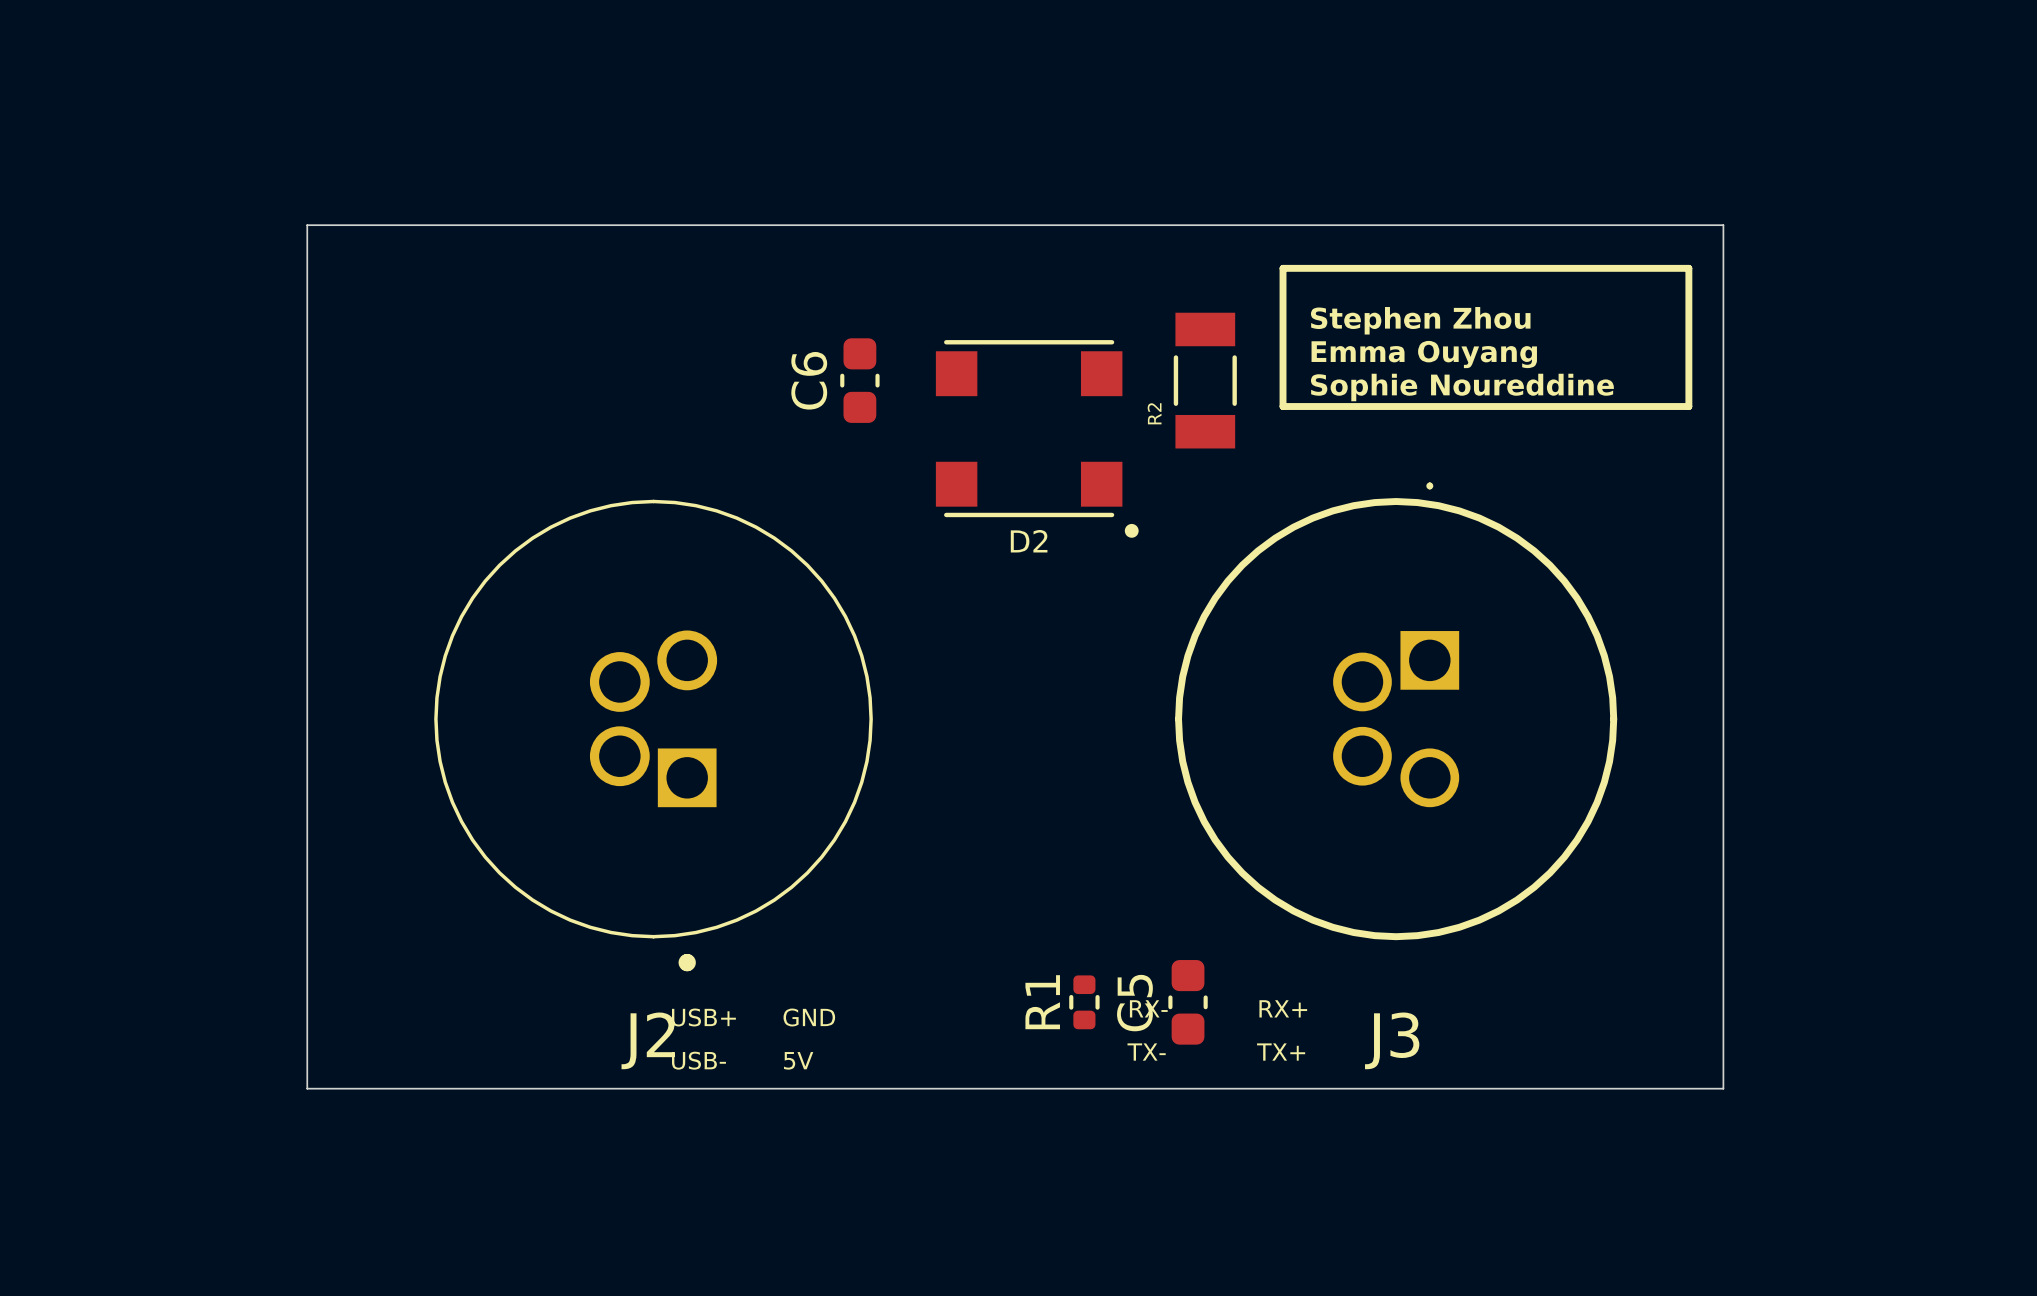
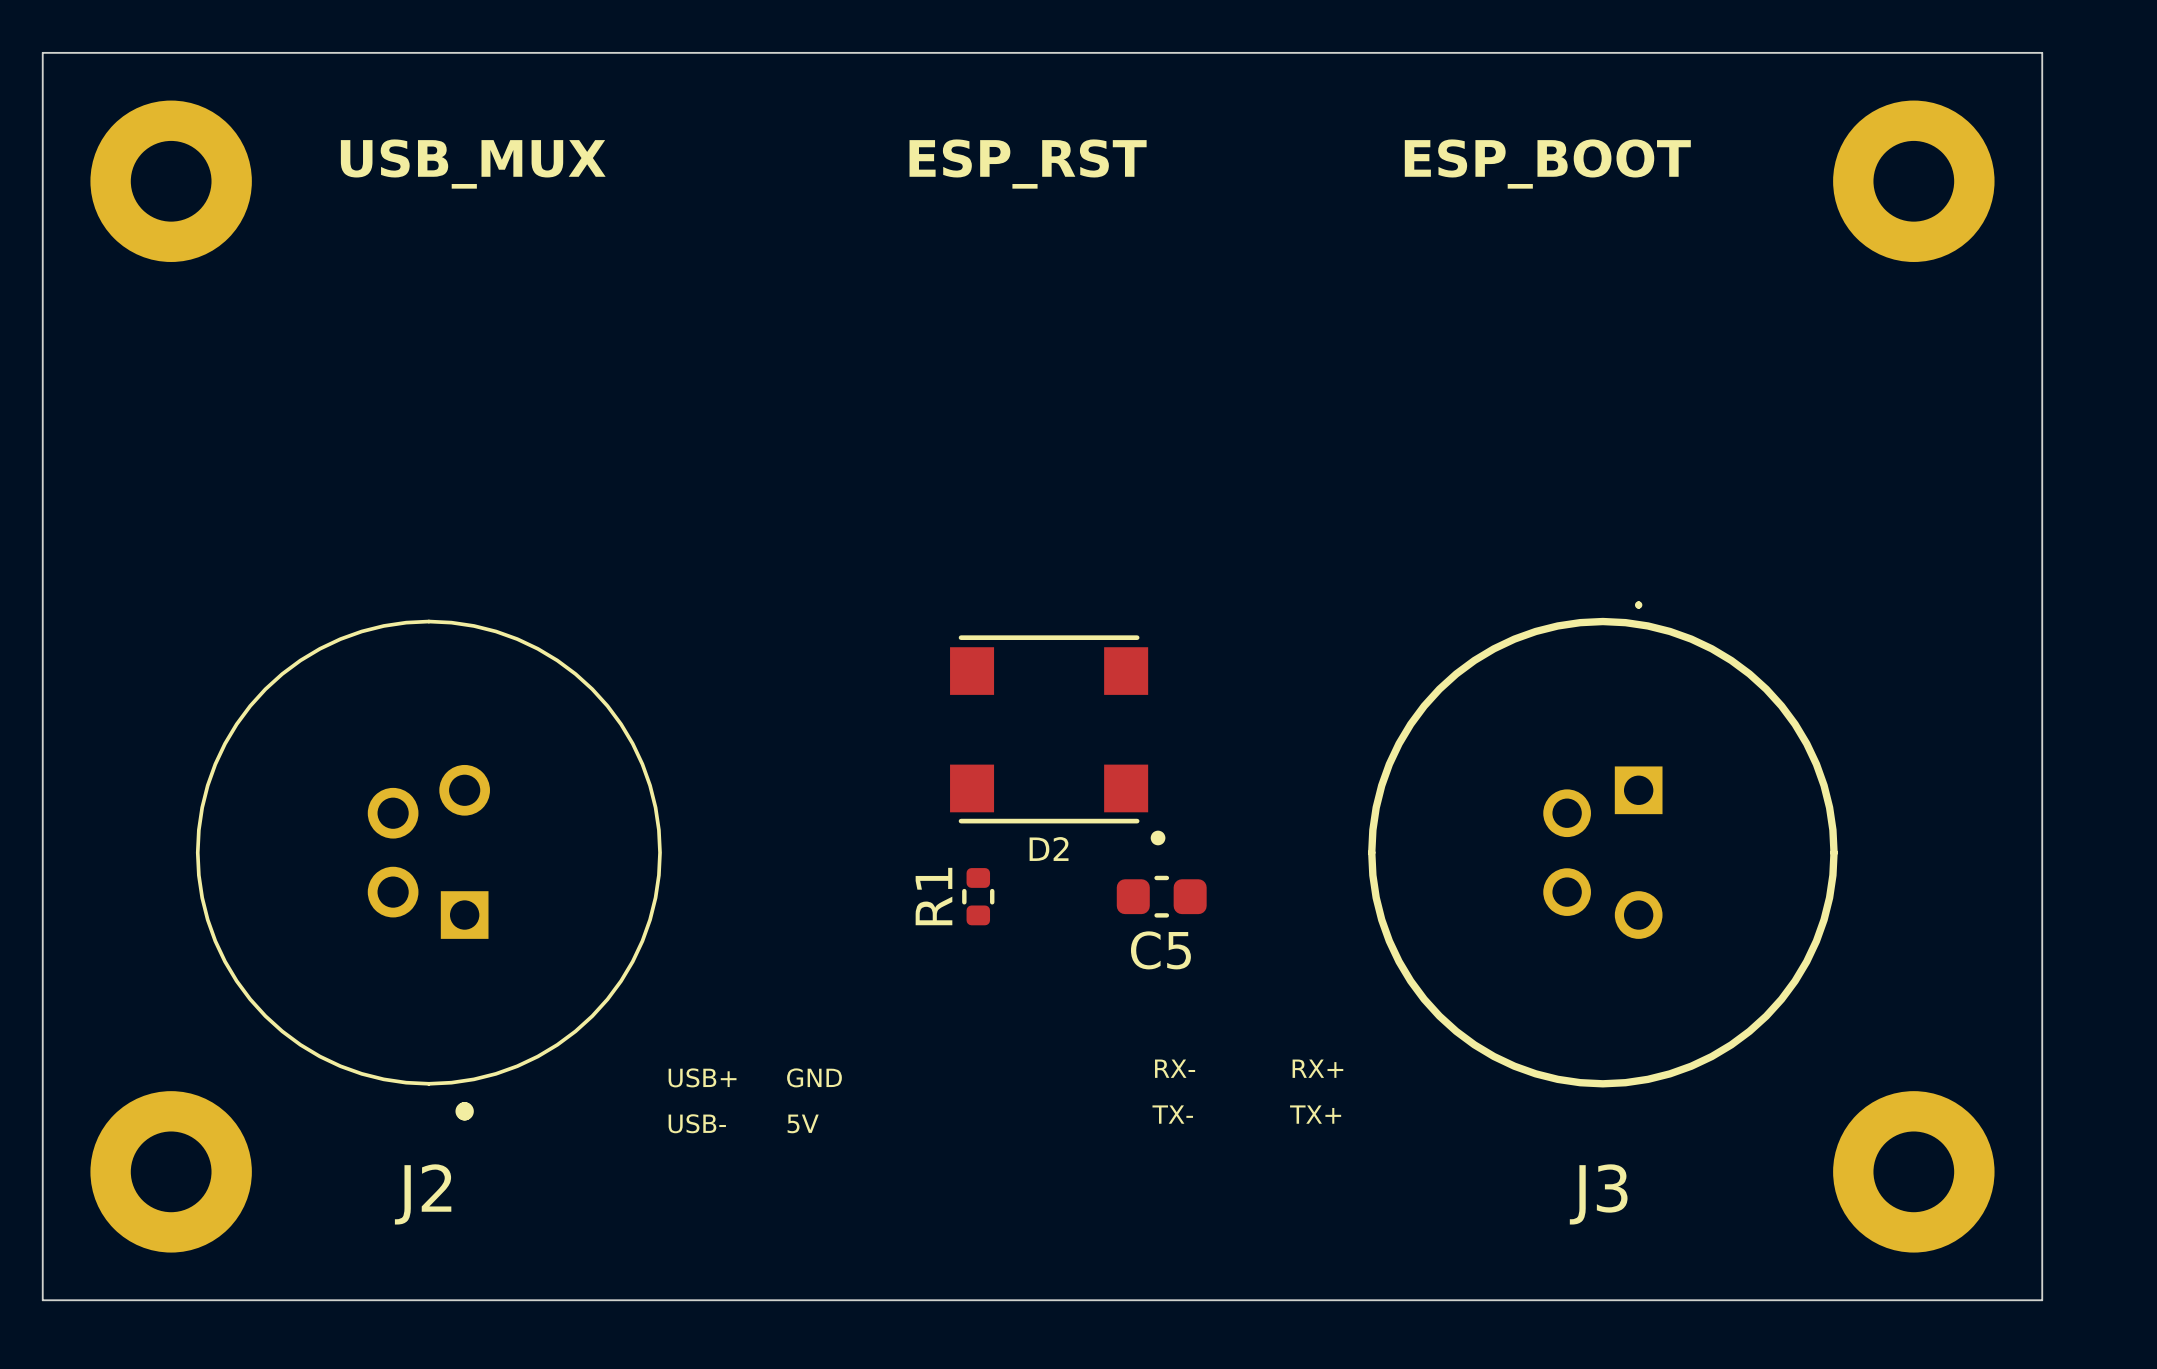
text: none -> USB_MUX (473, 164)
text: none -> ESP_RST (1028, 164)
text: none -> ESP_BOOT (1547, 164)
part: none -> (171, 181)
part: none -> (1913, 181)
board edge: (307, 225) (1723, 225) (1723, 1088) (307, 1088) (307, 225) -> (42, 52) (42, 1300) (2042, 1300) (2042, 52) (42, 52)
line: (1283, 268) (1688, 268) (1688, 406) (1283, 406) (1283, 268) -> none
text: Stephen Zhou (1420, 320) -> none
text: Emma Ouyang (1424, 354) -> none
C6: (859, 380) -> none
R2: (1205, 380) -> none
text: Sophie Noureddine (1462, 387) -> none
D2 position: (1037, 438) -> (1057, 740)
J3 footprint: [1175, 482, 1618, 941] -> [1368, 601, 1838, 1088]
J2 footprint: [434, 499, 873, 972] -> [195, 619, 662, 1121]
R1 position: (1084, 1002) -> (978, 896)
C5 rotation: 0° (1188, 1002) -> 90° clockwise (1161, 896)
C5 position: (1188, 1002) -> (1161, 896)
C5 name position: C5 (1134, 1003) -> C5 (1160, 950)
part: none -> (171, 1171)
part: none -> (1913, 1171)

